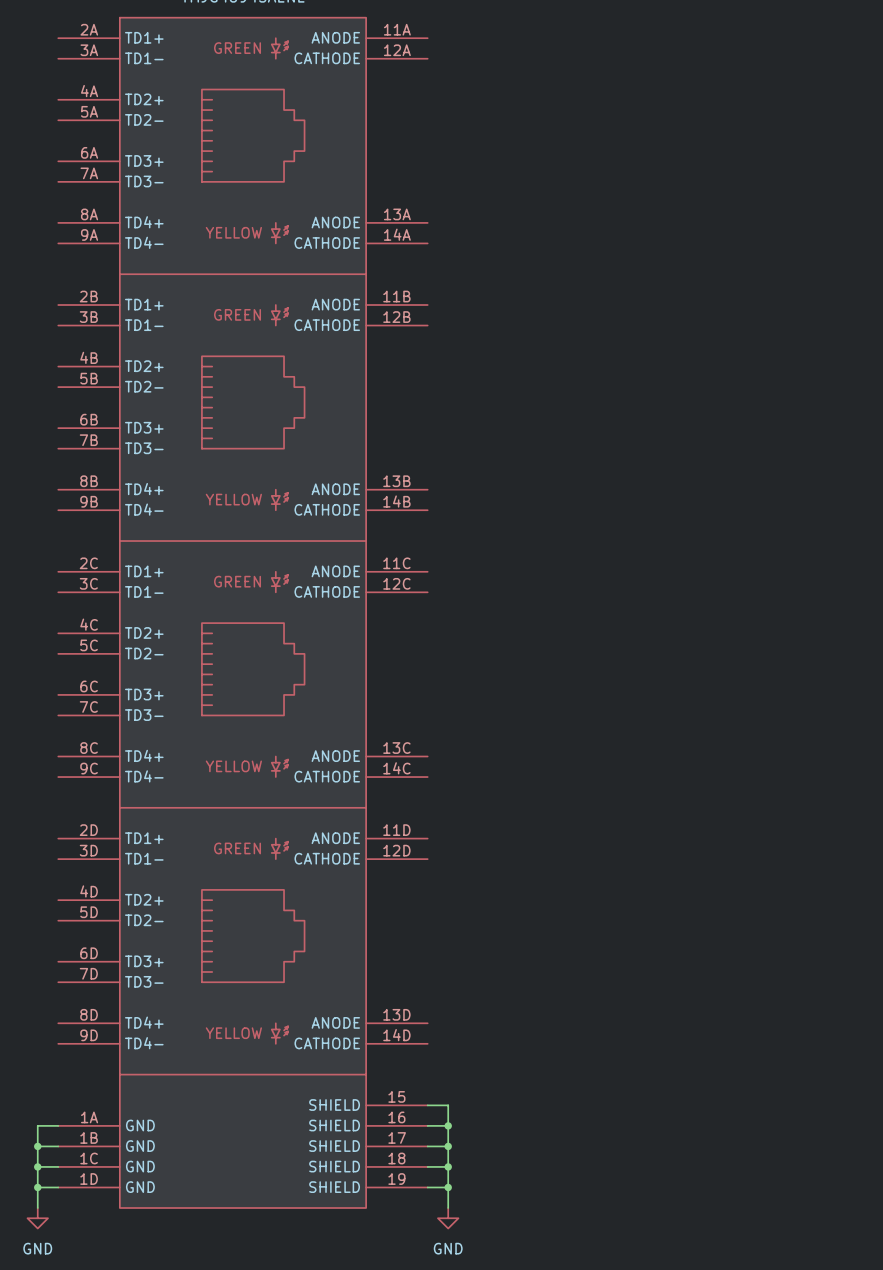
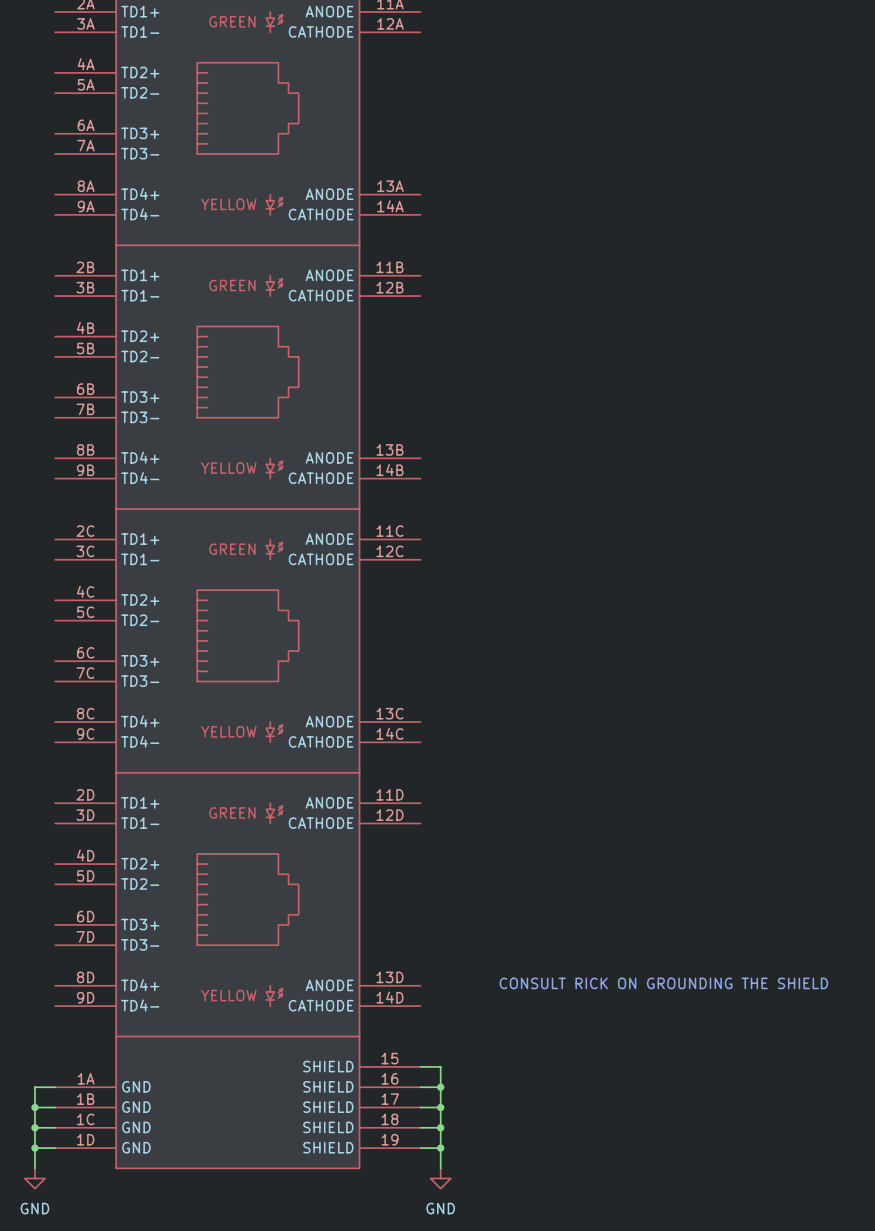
text: none -> CONSULT RICK ON GROUNDING THE SHIELD (663, 983)

